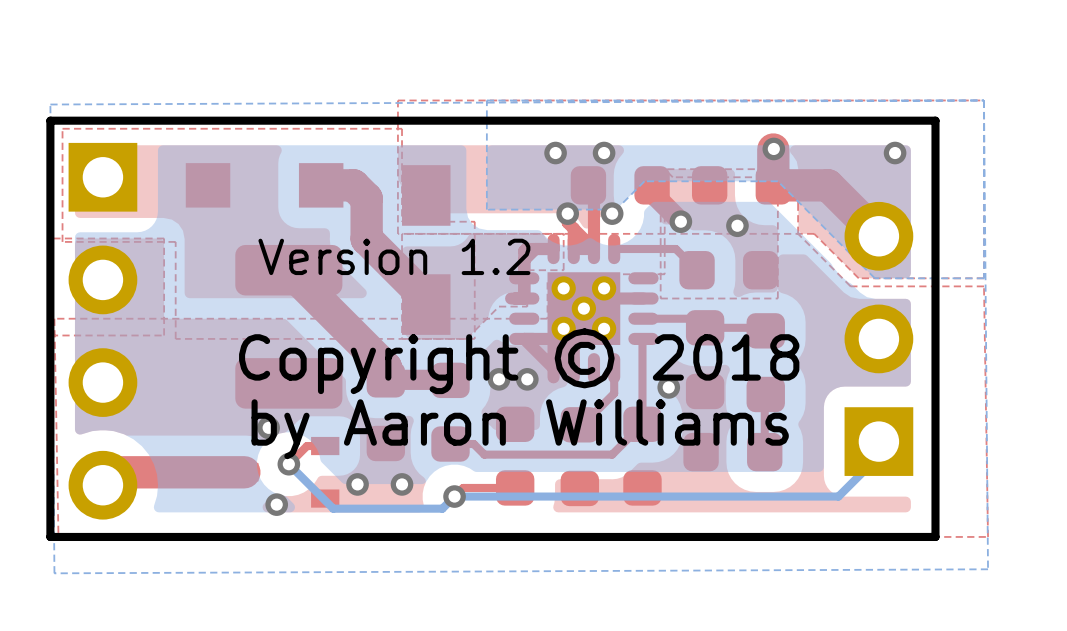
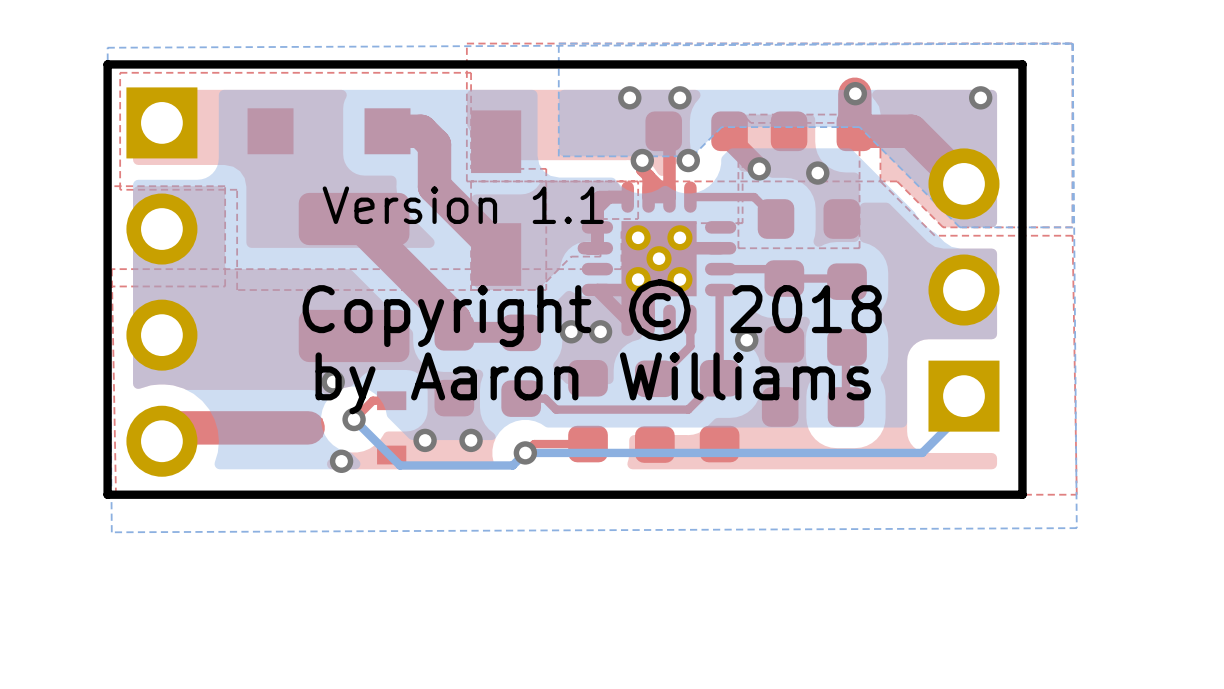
text: Version 1.2 (394, 256) -> Version 1.1 (463, 205)

